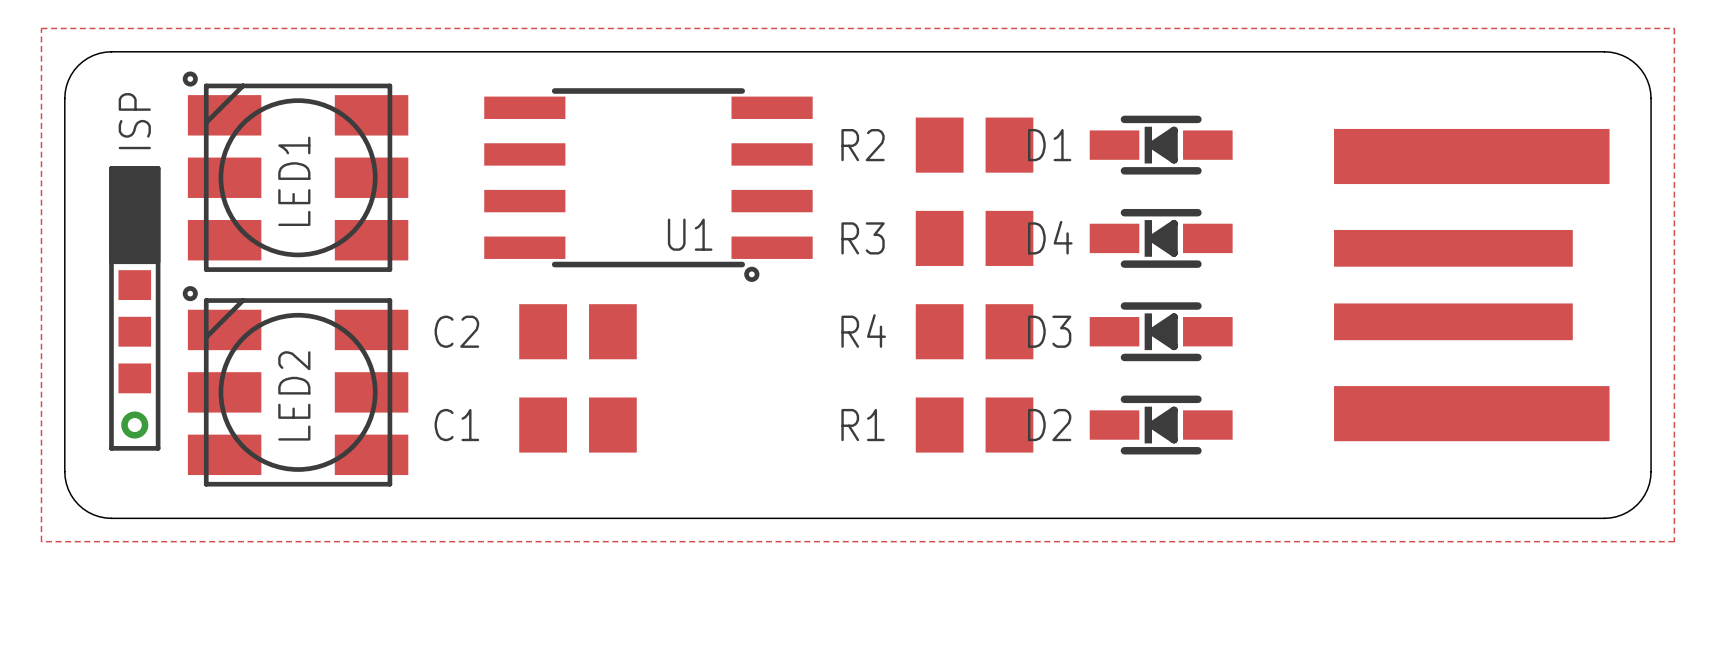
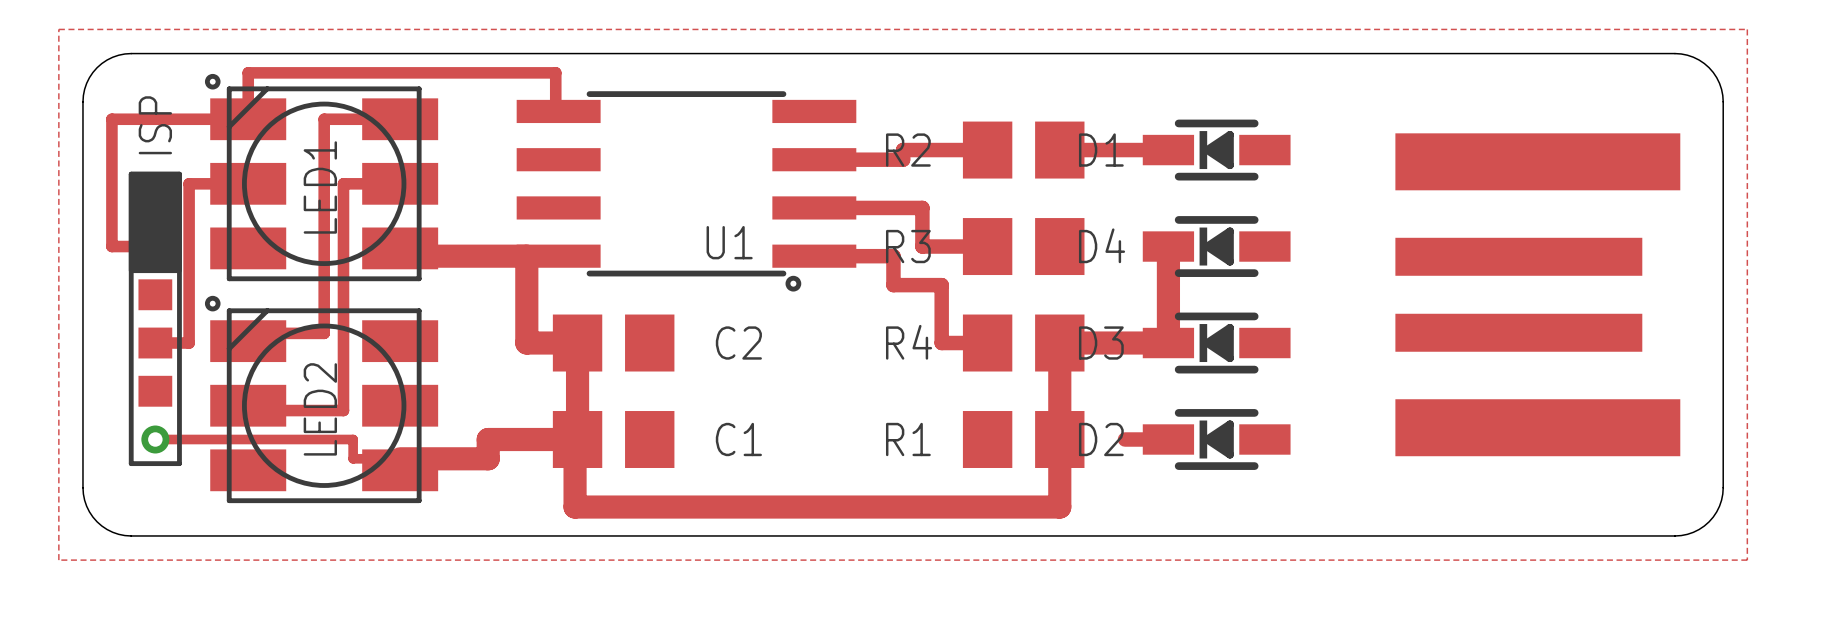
track: none -> (558, 111) (555, 111) (555, 72) (248, 72) (248, 119) (111, 119) (111, 246) (155, 246)
track: none -> (400, 119) (324, 119) (324, 333) (248, 333) (248, 342)
track: none -> (987, 150) (903, 150) (903, 159) (814, 159)
track: none -> (1059, 150) (1168, 150)
track: none -> (248, 183) (189, 183) (189, 343) (155, 343)
track: none -> (400, 183) (343, 183) (343, 410) (248, 410) (248, 406)
track: none -> (814, 207) (922, 207) (922, 246) (987, 246)
track: none -> (1168, 246) (1168, 343) (1059, 343) (1059, 507) (575, 507) (575, 439)
track: none -> (400, 248) (400, 256) (526, 256)
track: none -> (526, 256) (526, 343) (577, 343) (577, 439) (575, 439)
track: none -> (814, 256) (893, 256) (893, 285) (941, 285) (941, 343) (987, 343)
C2 name position: C2 (456, 331) -> C2 (738, 343)
track: none -> (155, 439) (353, 439) (353, 458) (400, 458)
C1 name position: C1 (456, 425) -> C1 (738, 439)
track: none -> (575, 439) (488, 439) (488, 458) (400, 458)
track: none -> (1125, 439) (1168, 439)

